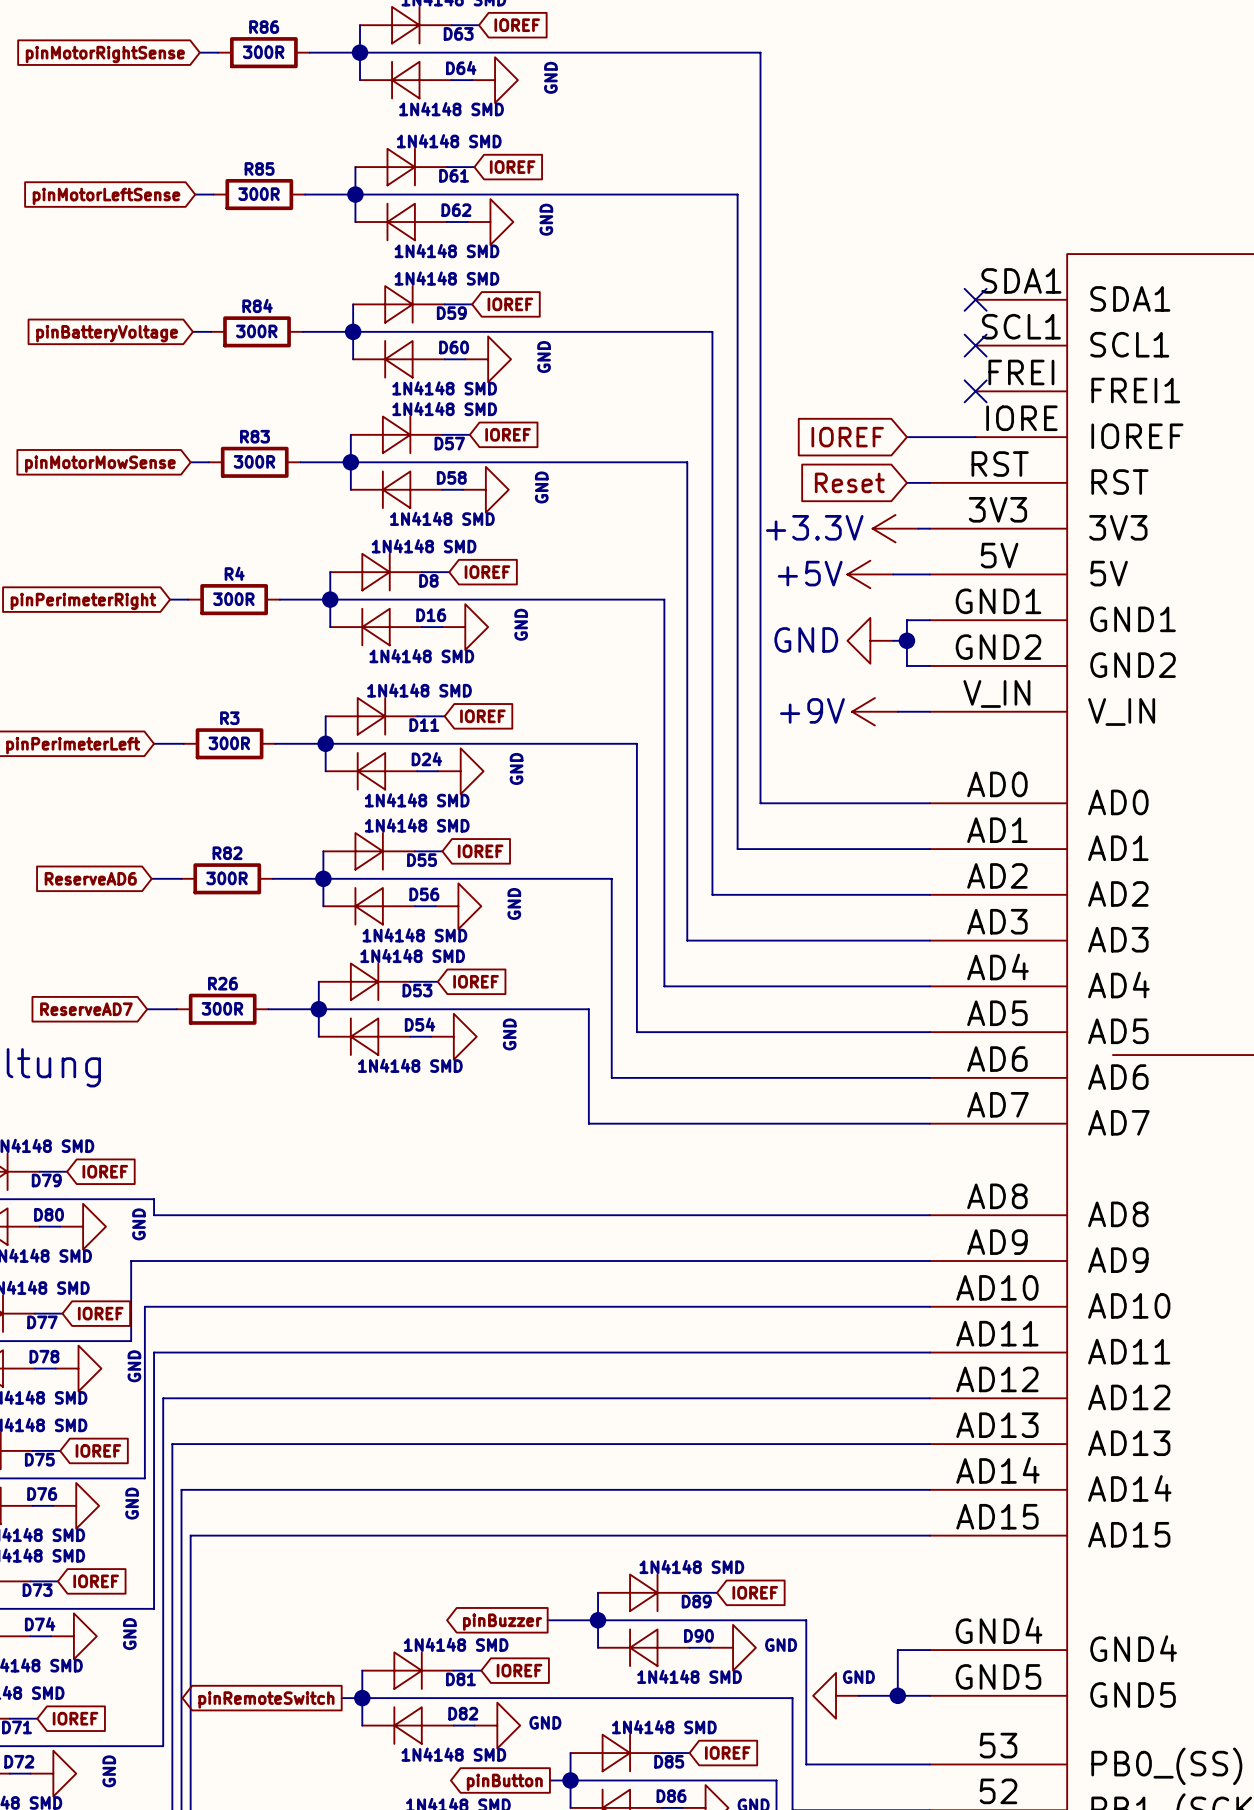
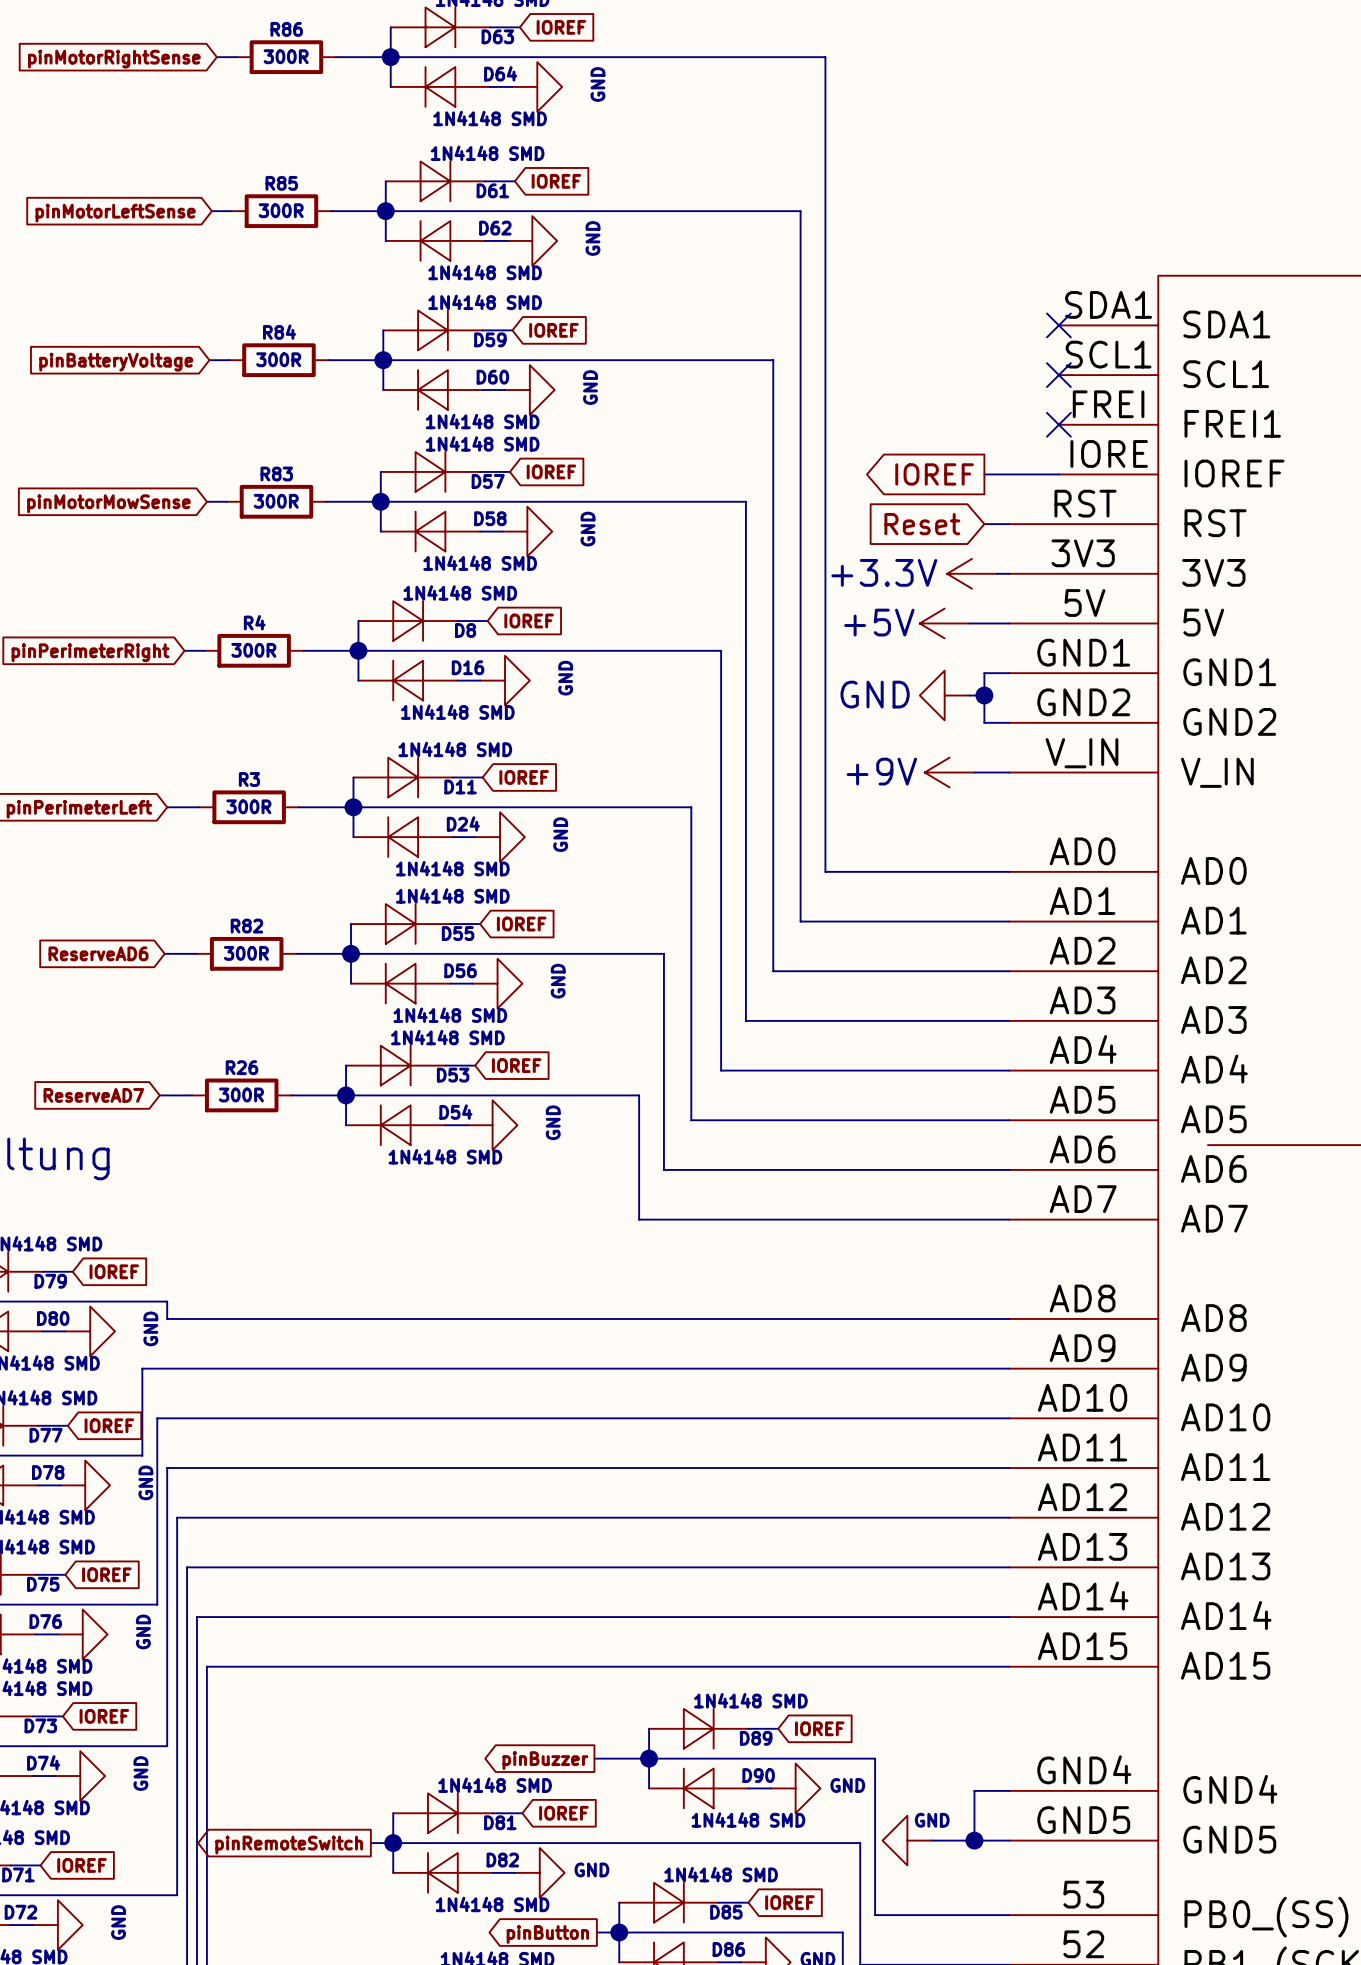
global label shape: input (847, 437) -> output (934, 474)

